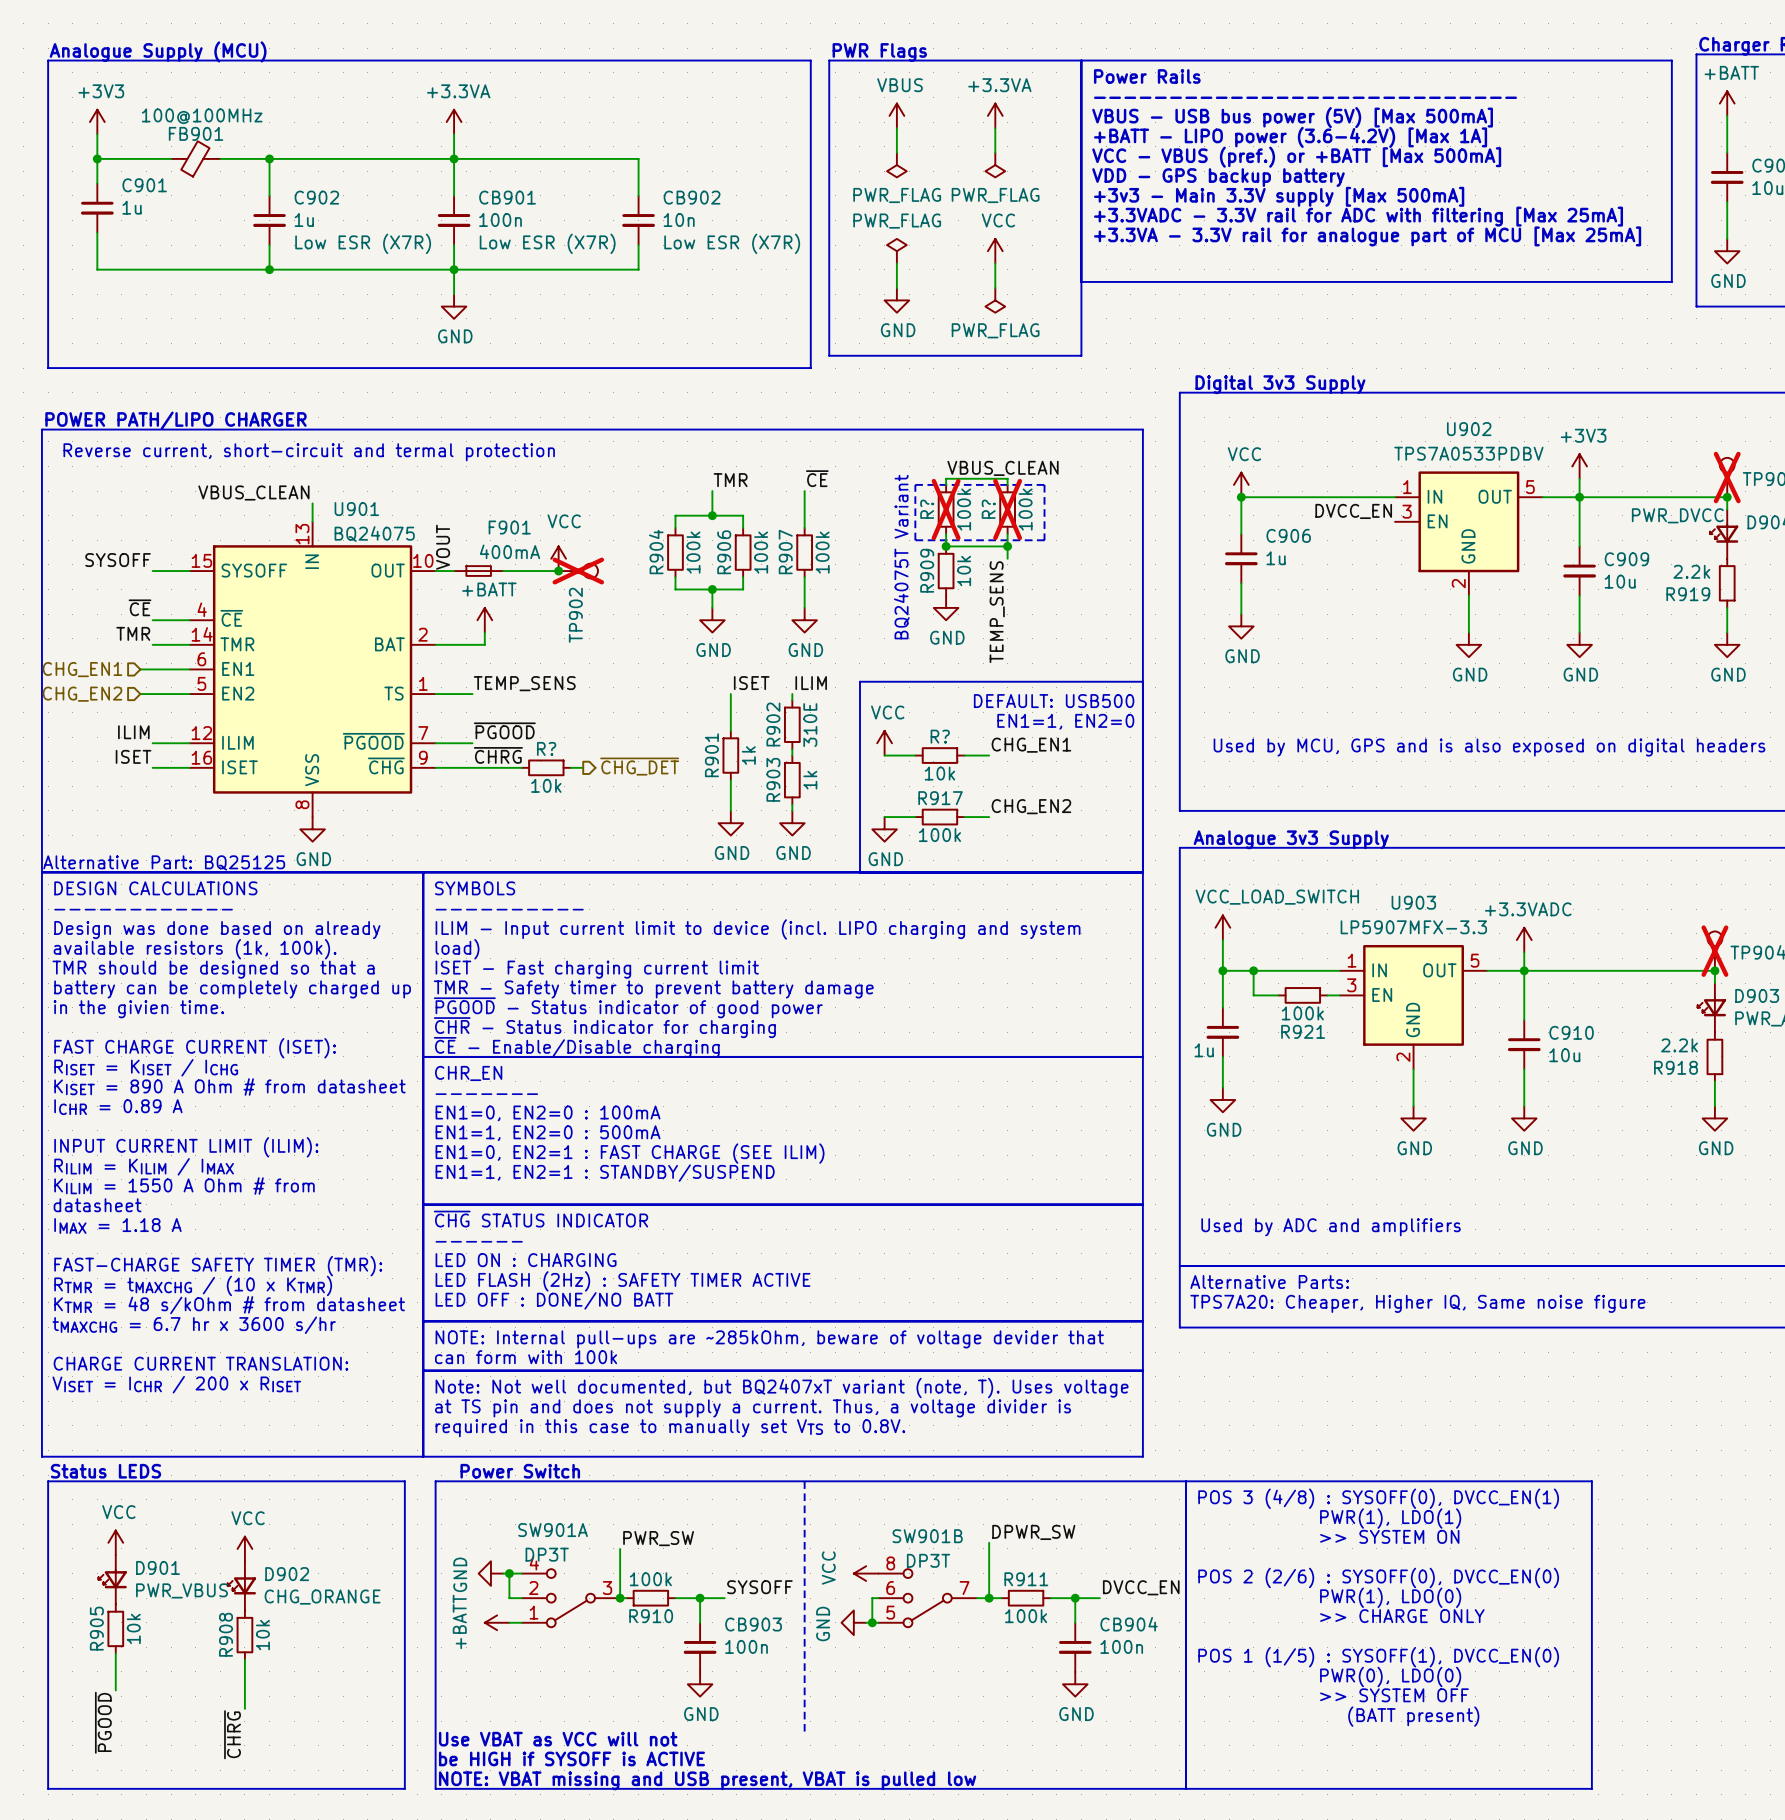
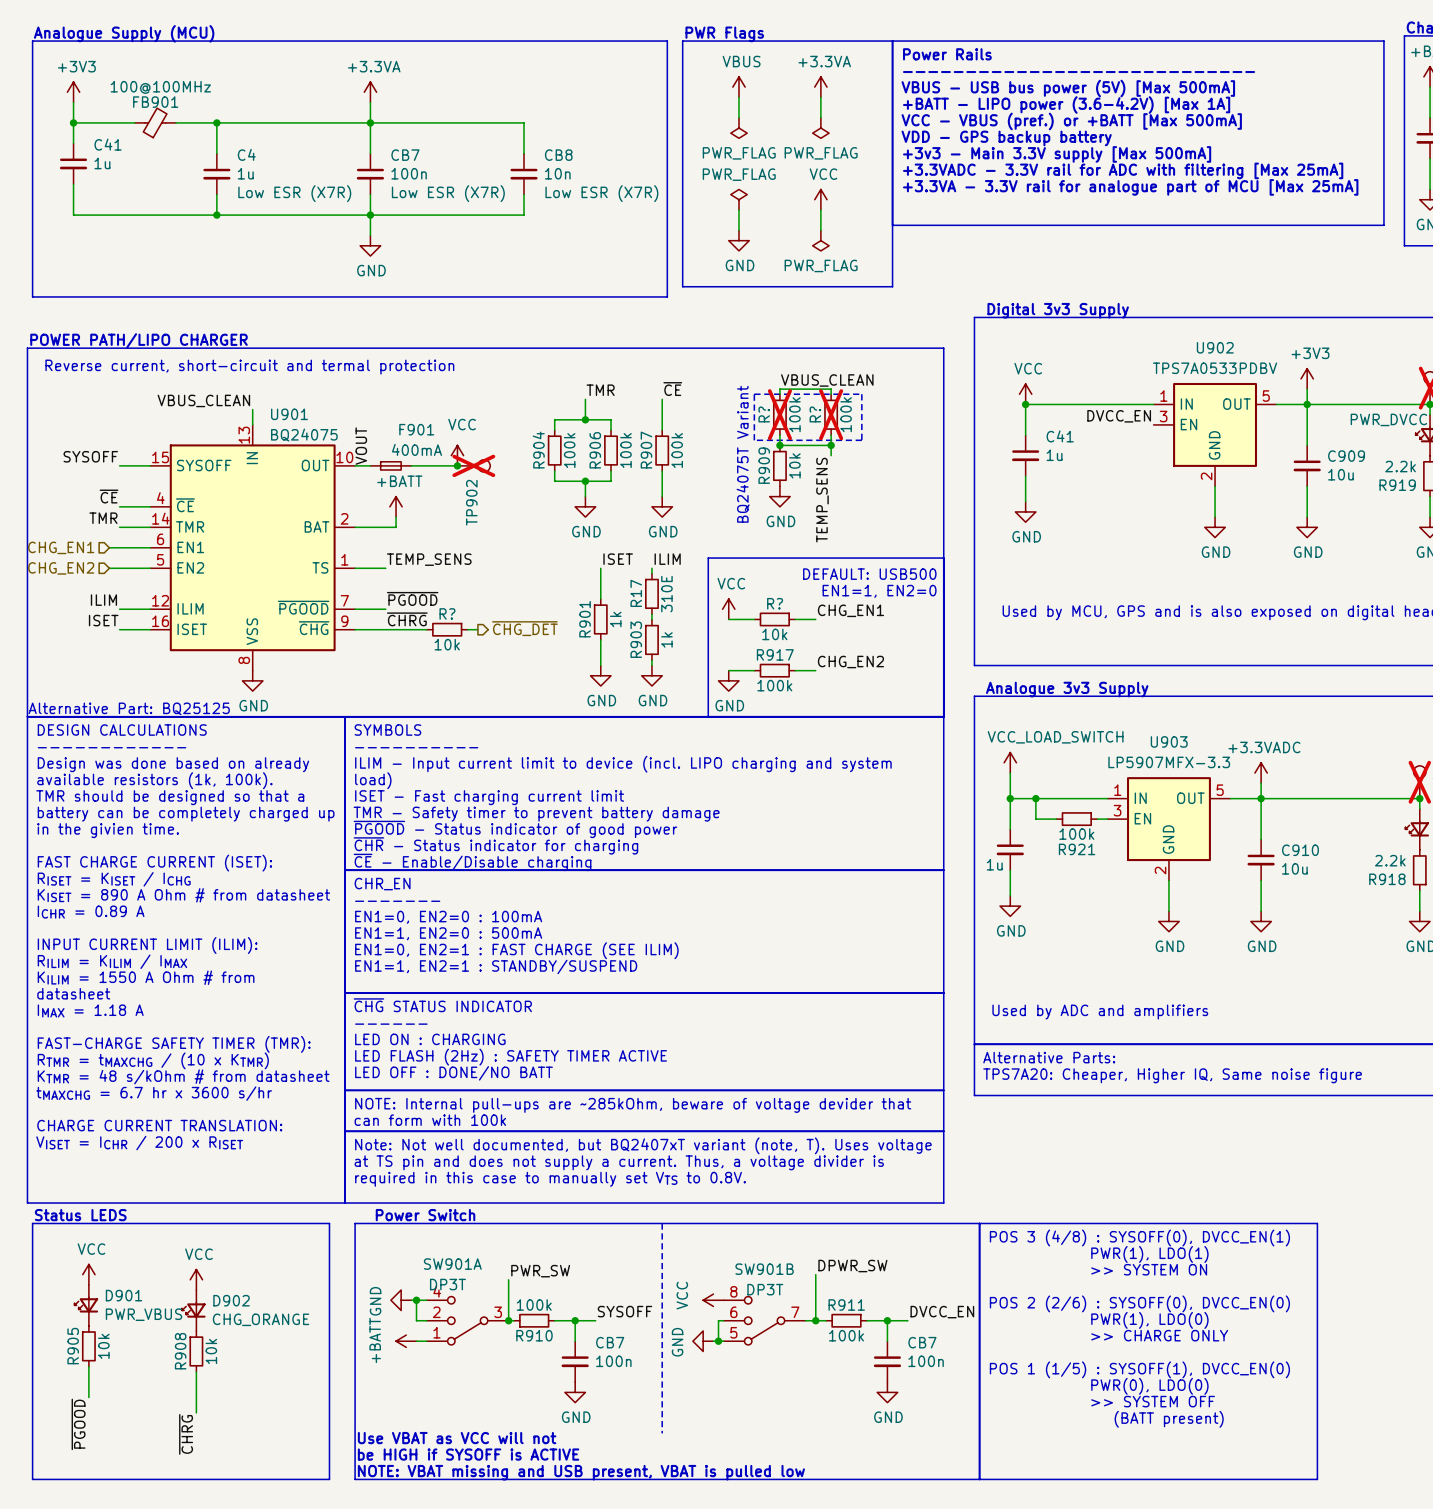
C901 name: C901 (144, 185) -> C41 (108, 144)
C902 name: C902 (316, 197) -> C4 (246, 154)
CB901 name: CB901 (507, 197) -> CB7 (405, 155)
CB902 name: CB902 (692, 197) -> CB8 (558, 155)
C906 name: C906 (1288, 535) -> C41 (1060, 436)
R902 name: R902 (773, 724) -> R17 (636, 593)
CB903 name: CB903 (753, 1624) -> CB7 (610, 1342)
CB904 name: CB904 (1129, 1624) -> CB7 (922, 1342)

